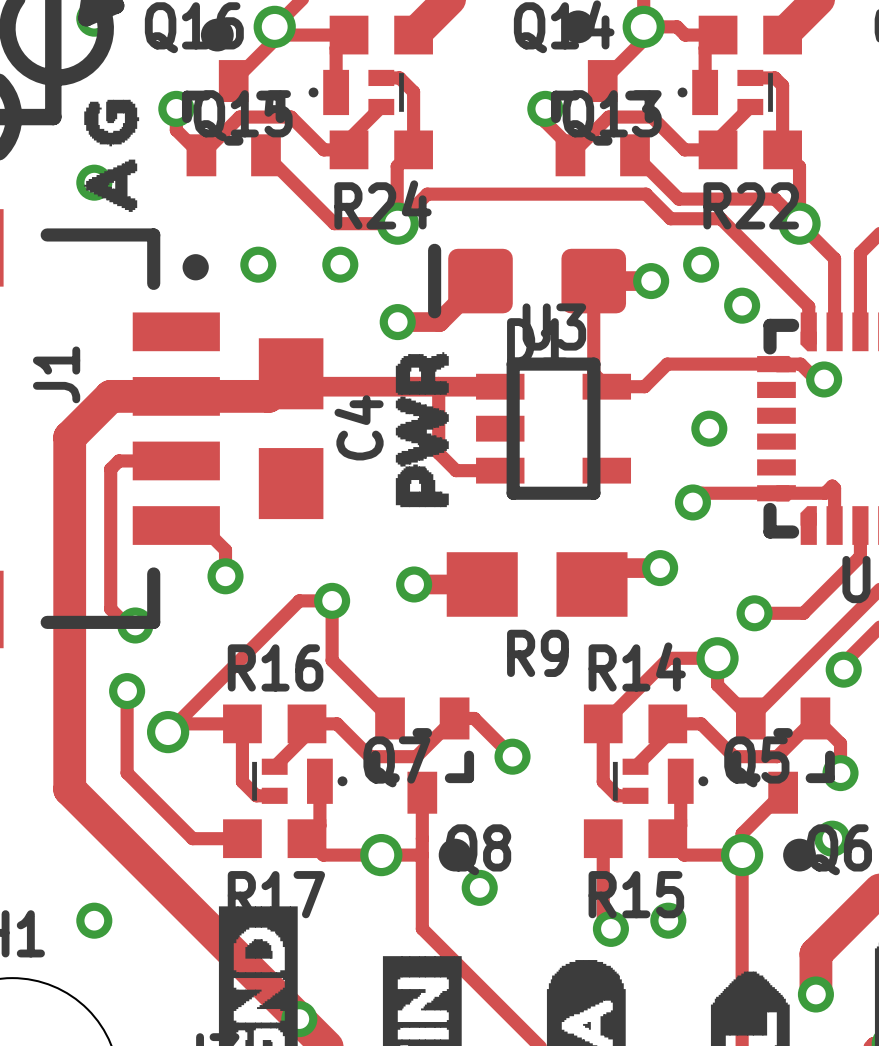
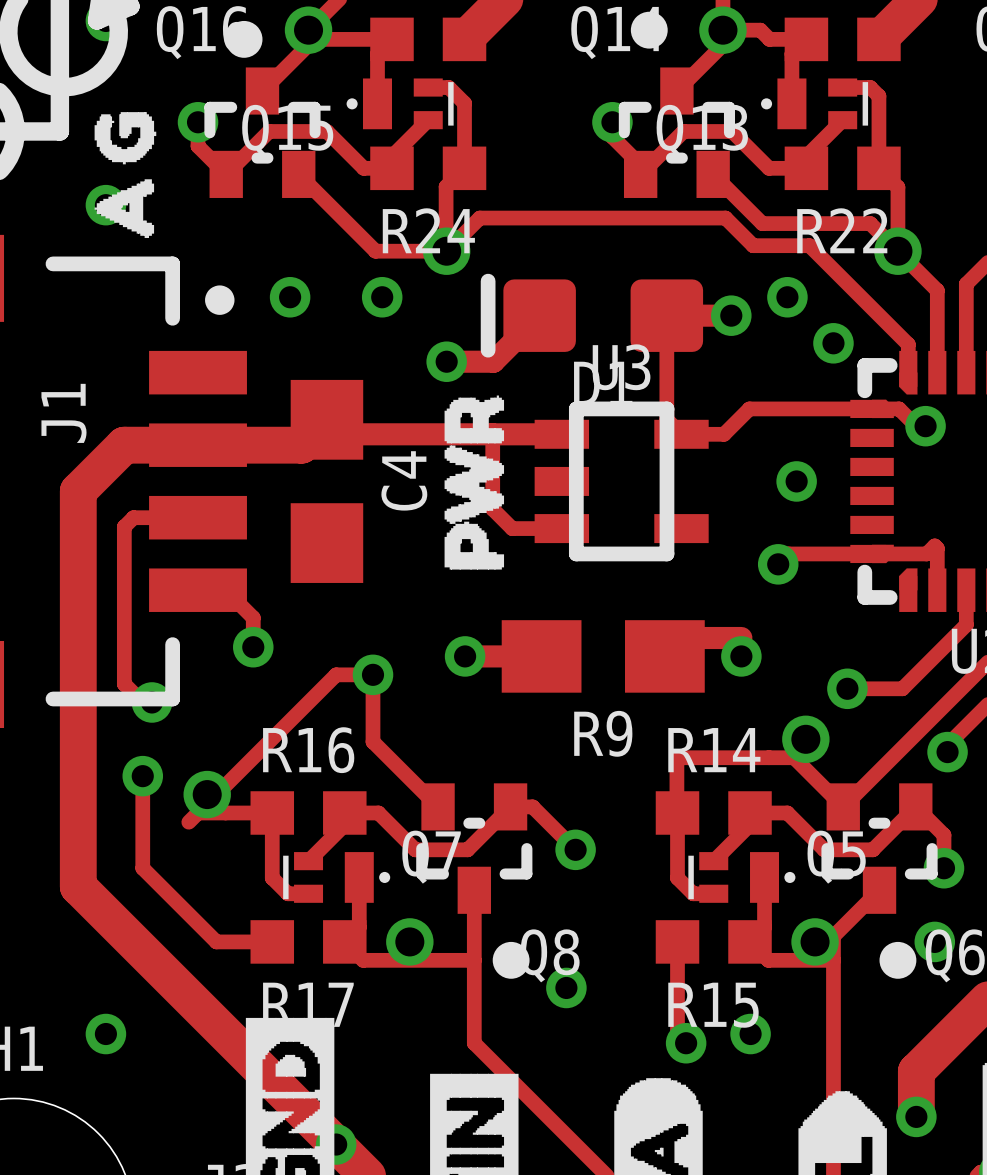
via position: (660, 568) -> (741, 656)
track: (717, 685) (717, 658) (668, 658) (603, 723) -> (805, 769) (794, 757) (676, 757) (676, 812)
part position: (168, 732) -> (207, 794)
part position: (381, 855) -> (409, 941)
part position: (742, 855) -> (815, 941)
via position: (479, 887) -> (566, 987)

